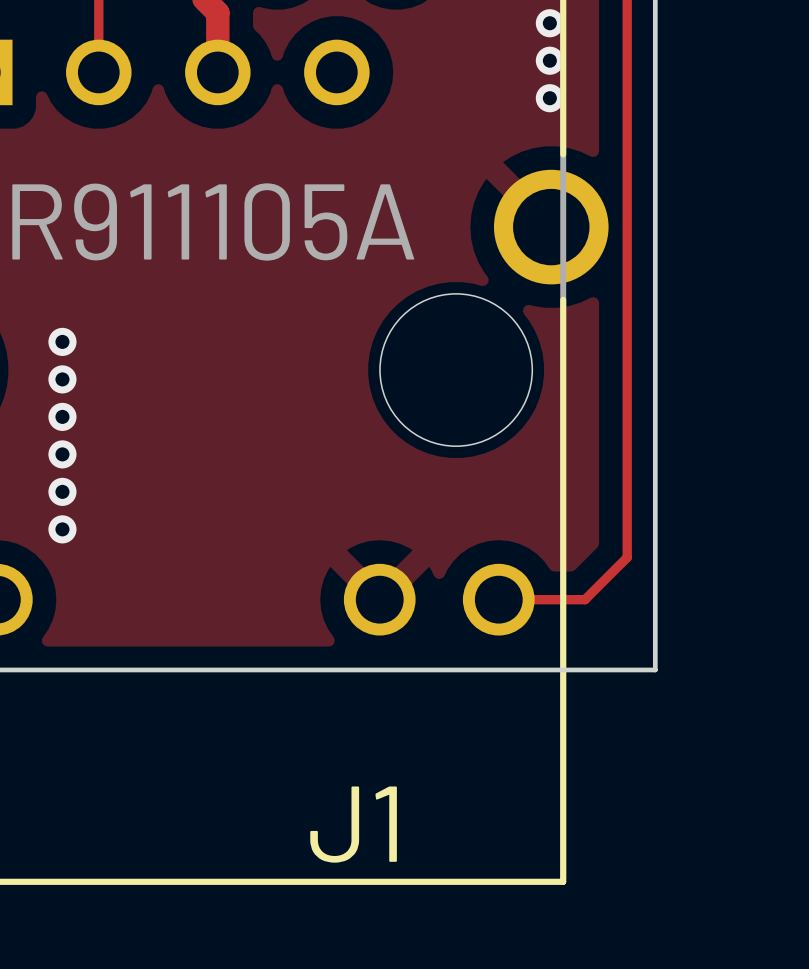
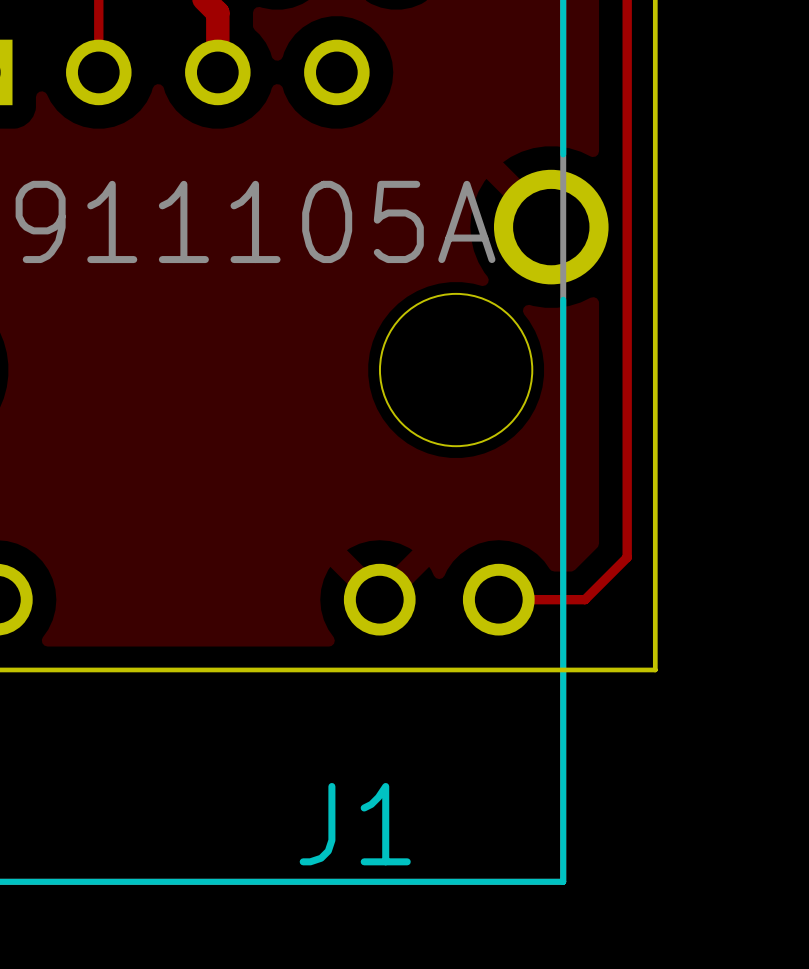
via: (549, 23) -> none
via: (549, 60) -> none
via: (549, 98) -> none
via: (62, 341) -> none
via: (62, 379) -> none
via: (62, 416) -> none
via: (62, 454) -> none
via: (62, 491) -> none
via: (62, 529) -> none

